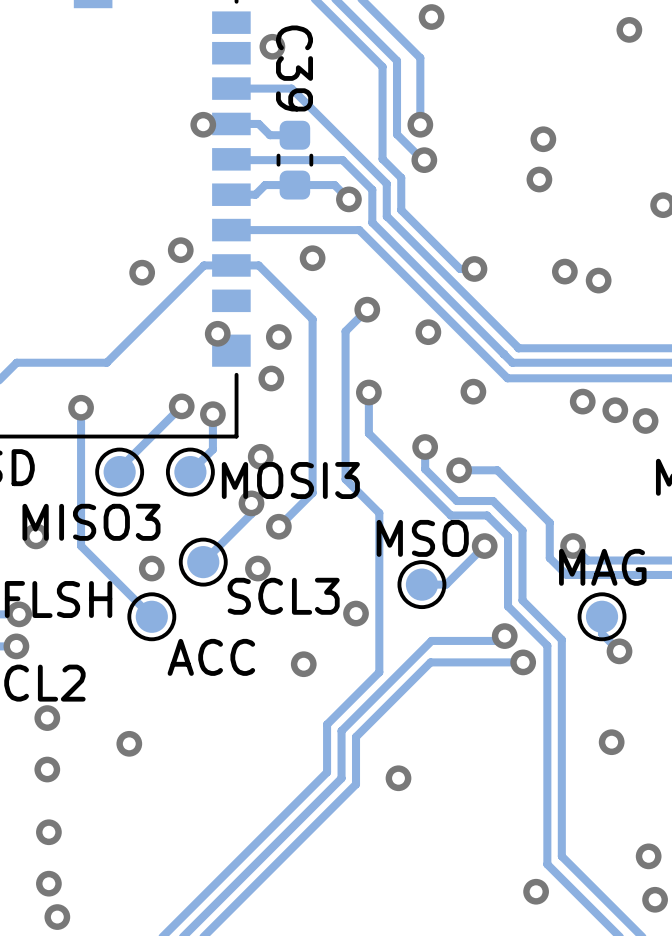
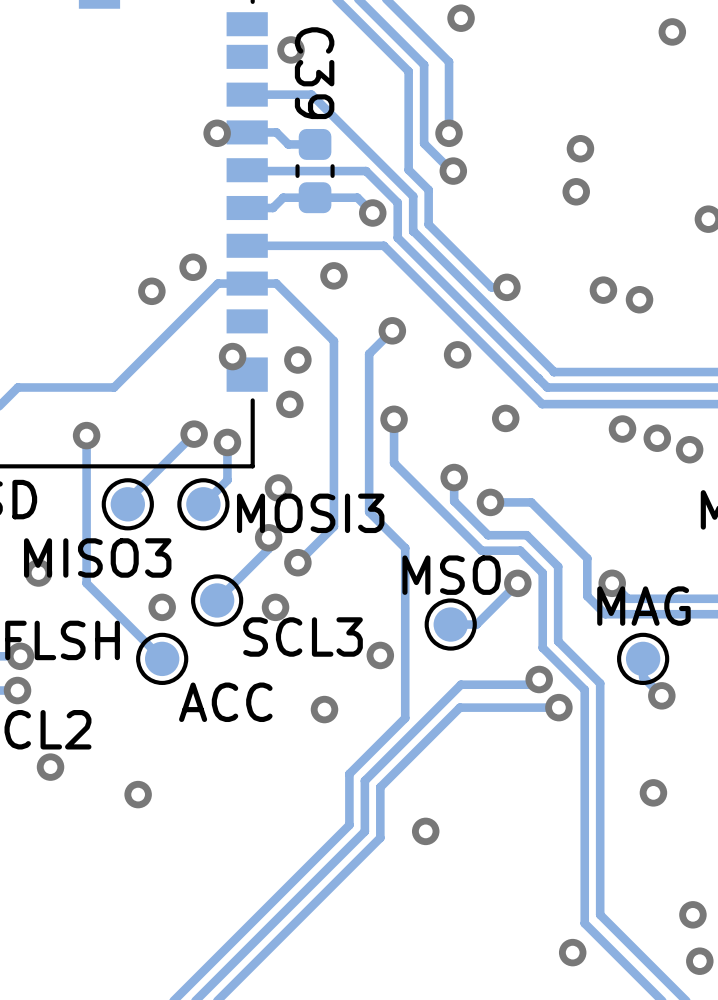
via: (47, 769) -> none
via: (48, 832) -> none
via: (48, 883) -> none
via: (57, 917) -> none

